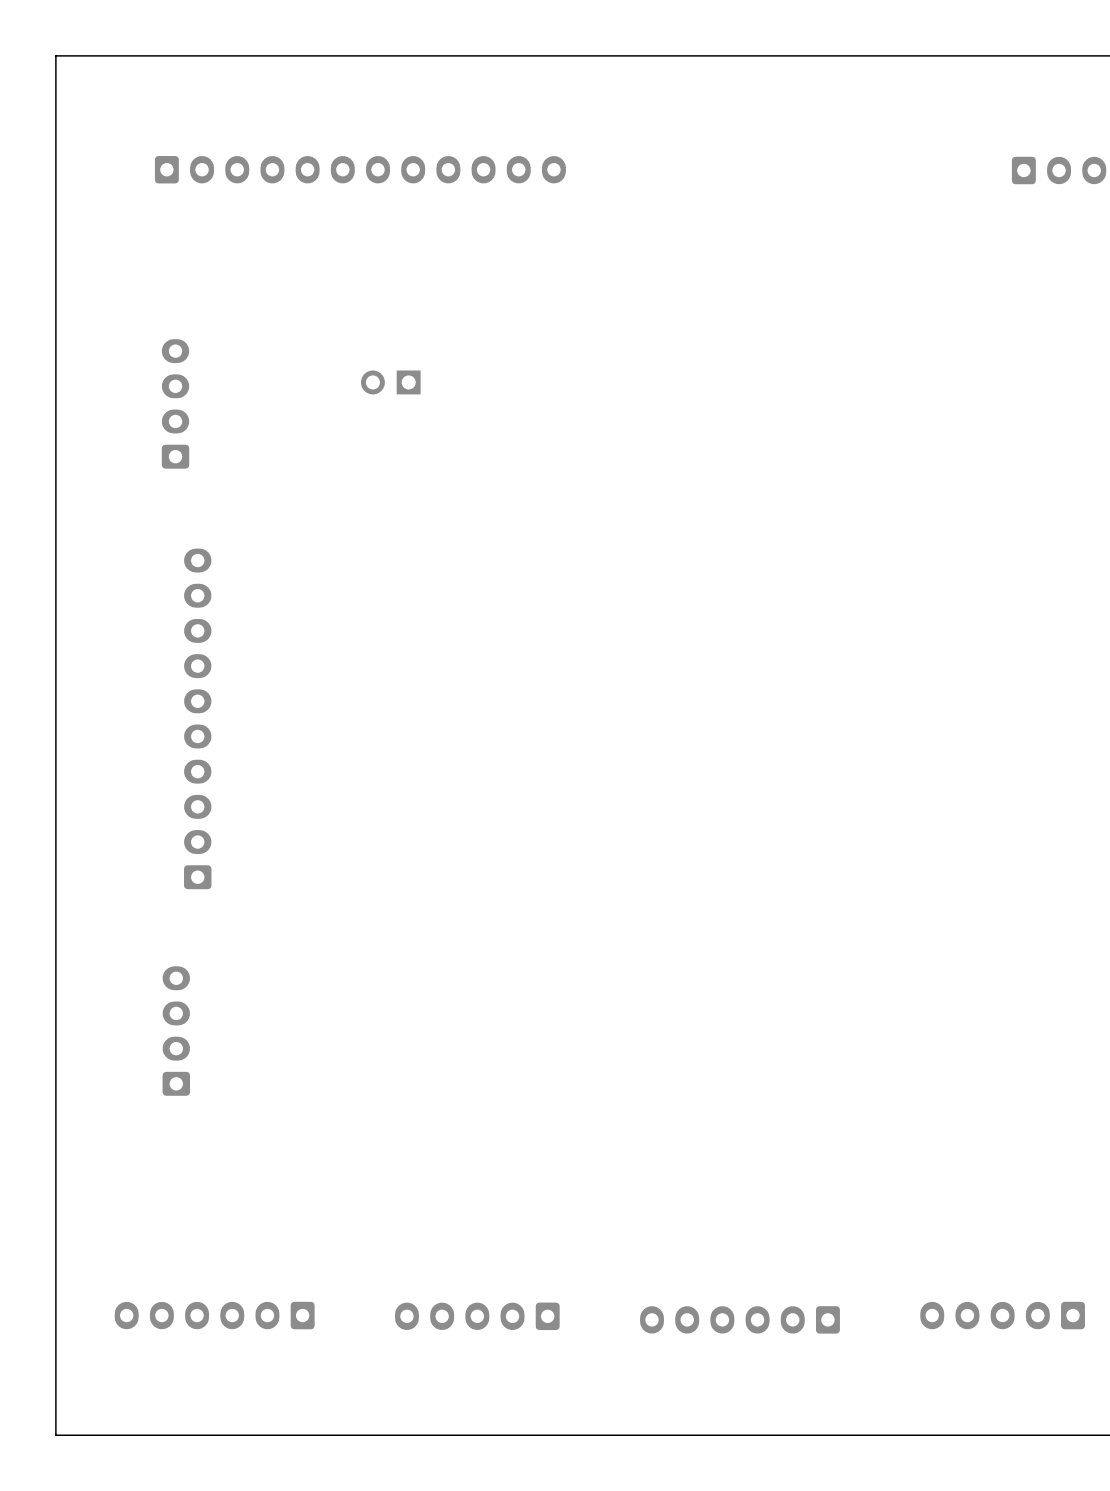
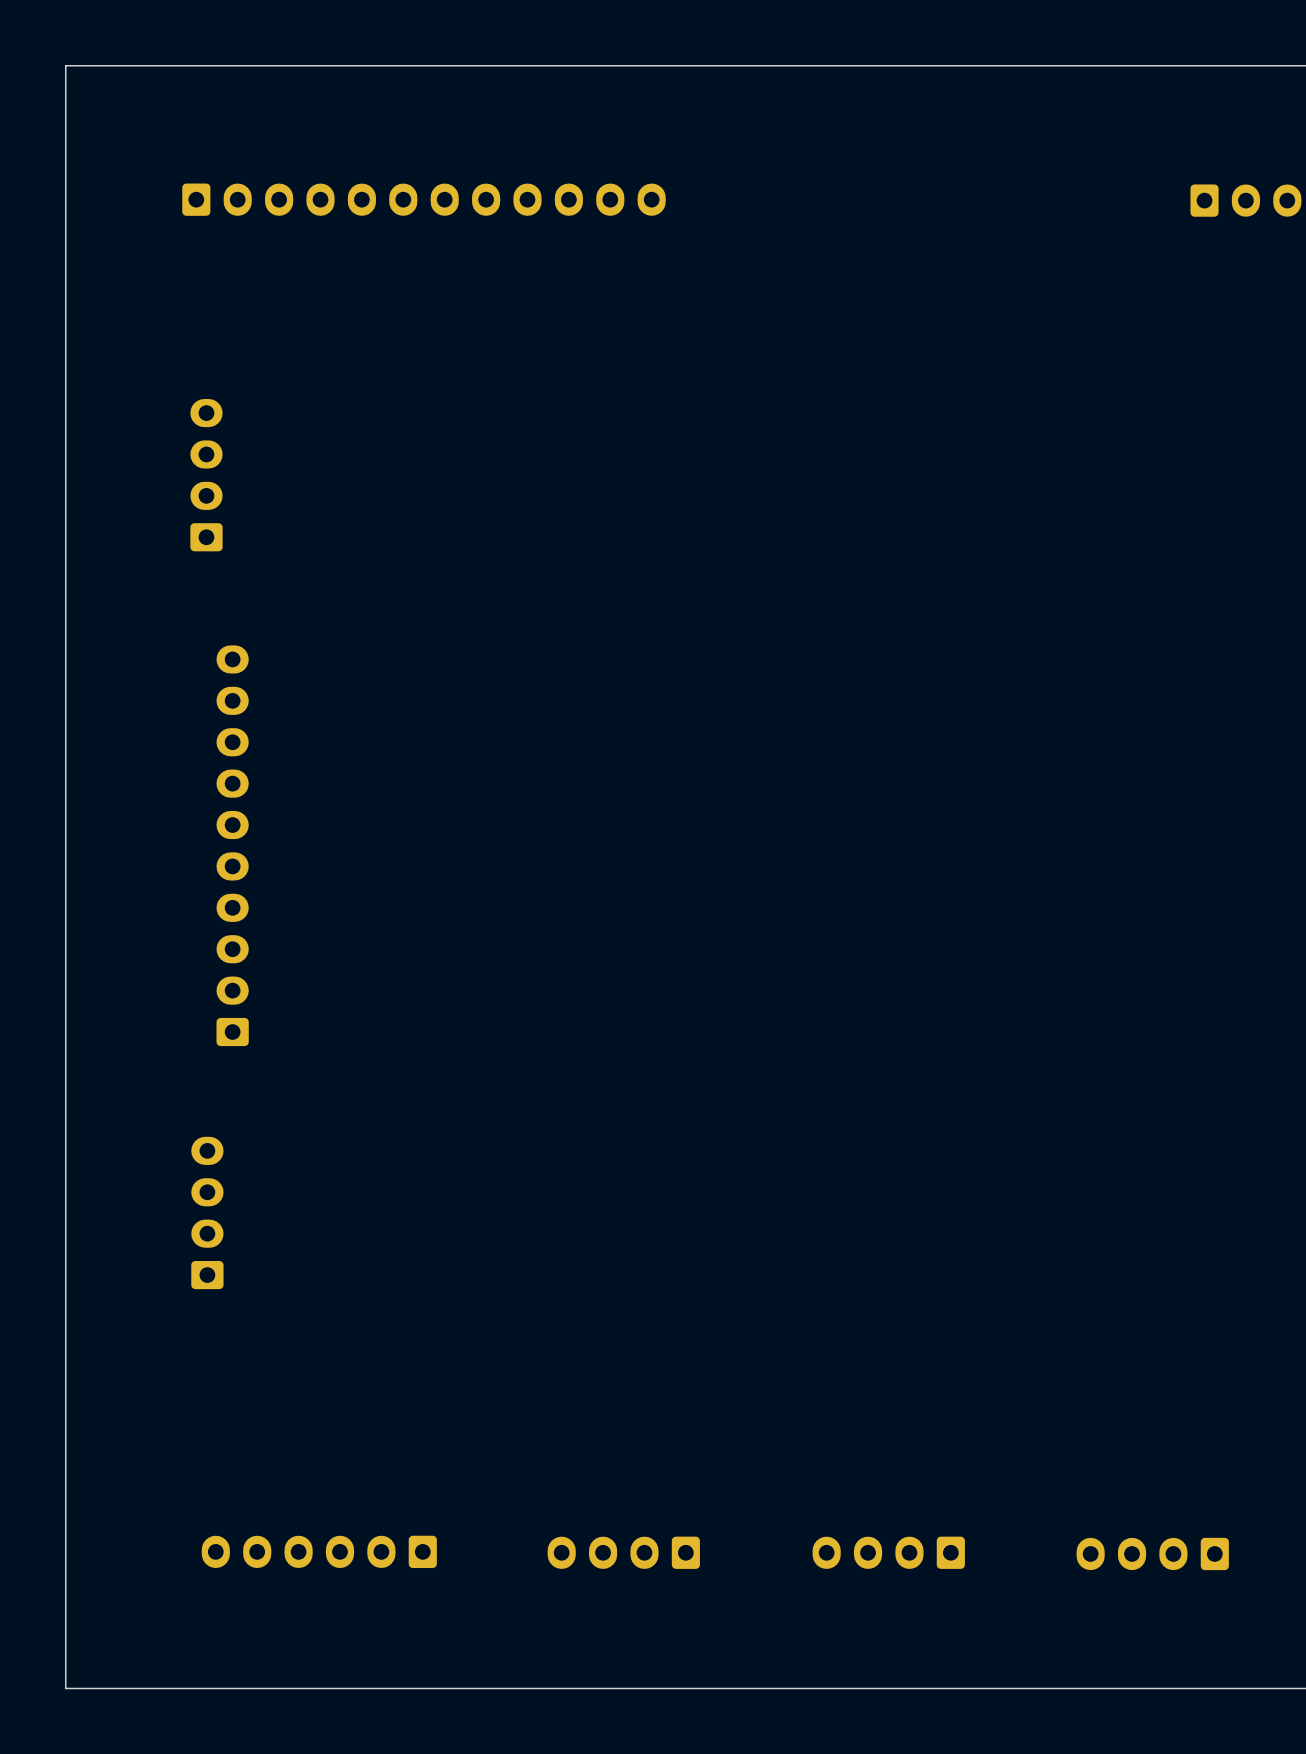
part: (390, 382) -> none
part position: (214, 1315) -> (319, 1551)
part: (1002, 1315) -> none
part: (477, 1316) -> none
part: none -> (623, 1552)
part: (739, 1319) -> none
part: none -> (888, 1552)
part: none -> (1152, 1553)

